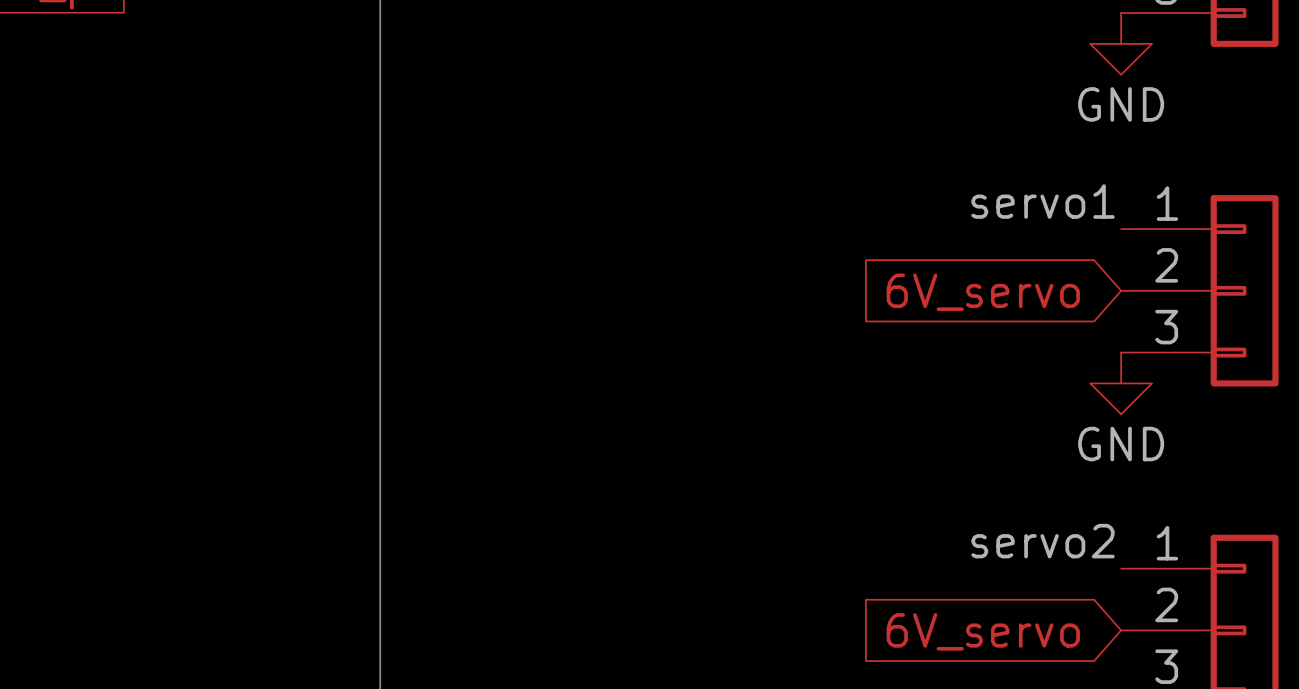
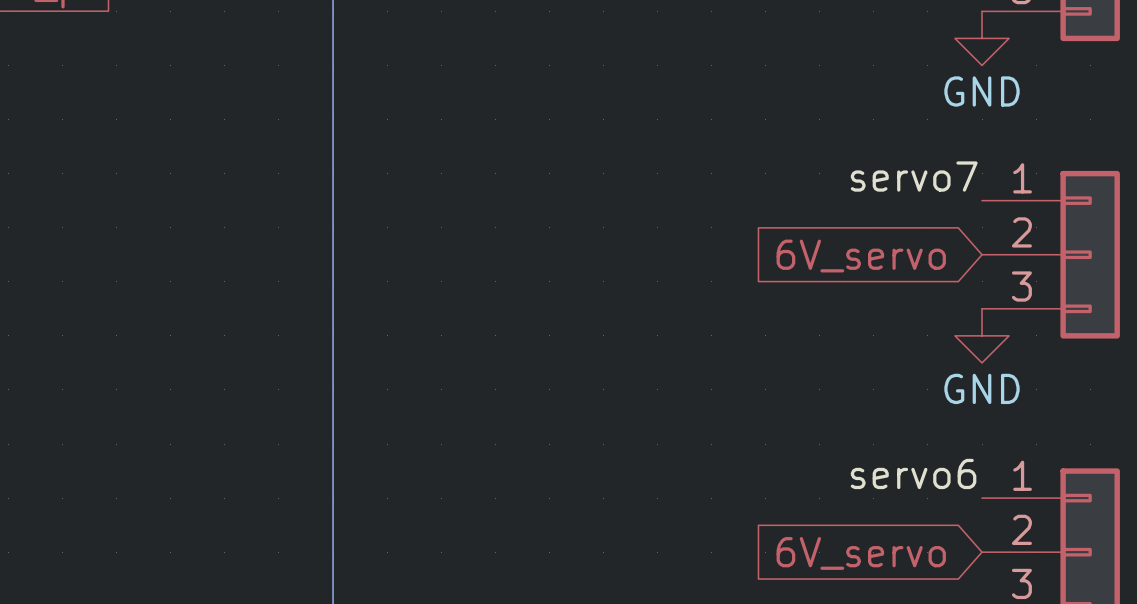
label: servo1 (1042, 201) -> servo7 (914, 176)
label: servo2 (1042, 541) -> servo6 (913, 473)

